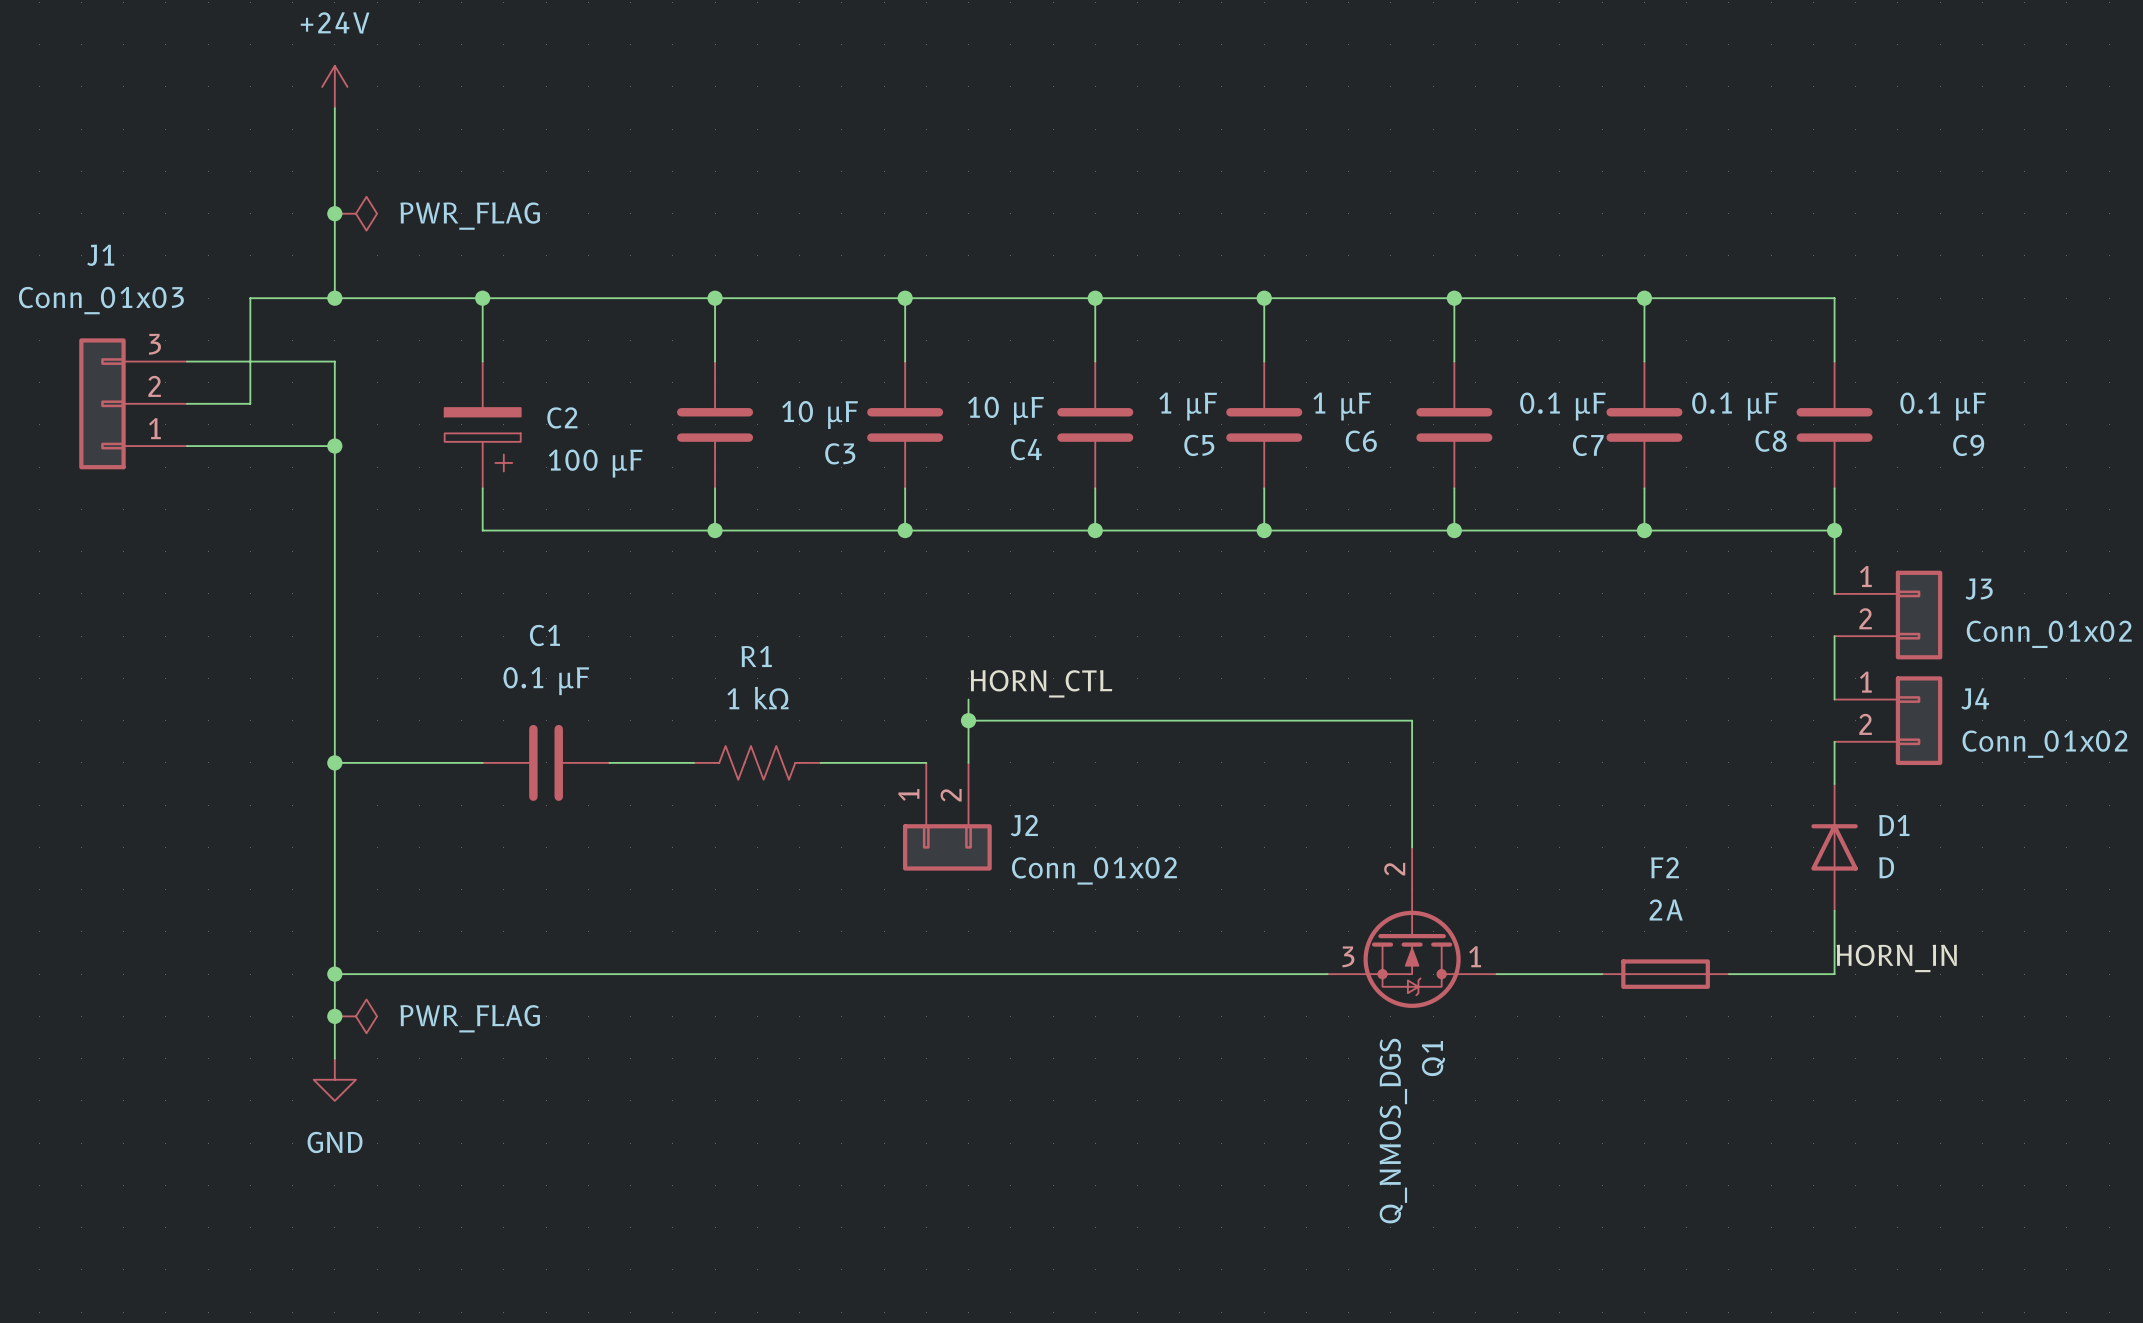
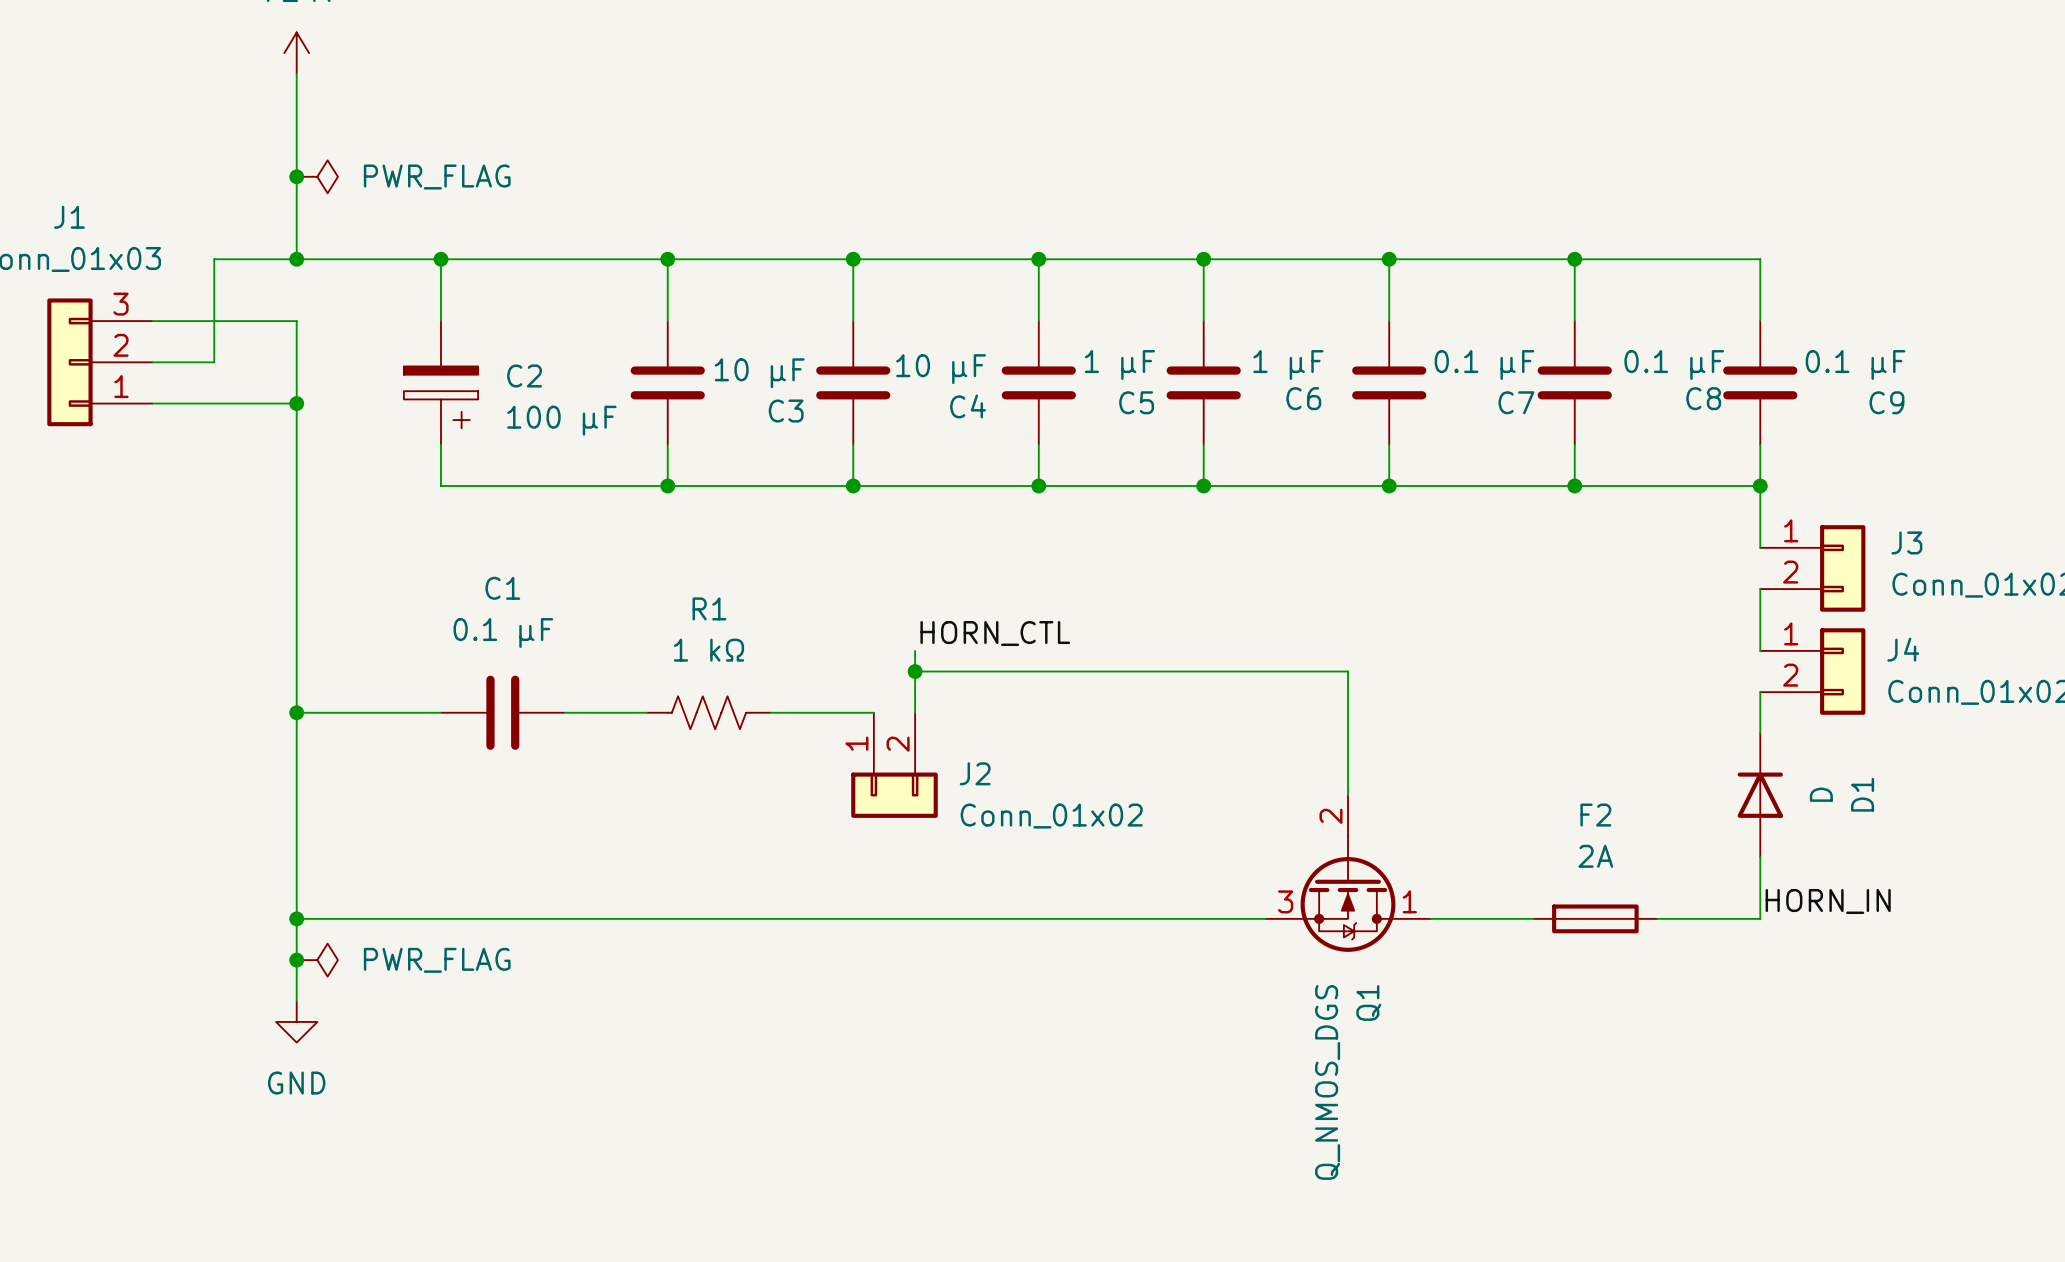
D1 name rotation: 0° (1894, 825) -> 90° counterclockwise (1862, 794)
D1 value rotation: 0° (1886, 867) -> 90° counterclockwise (1821, 794)

